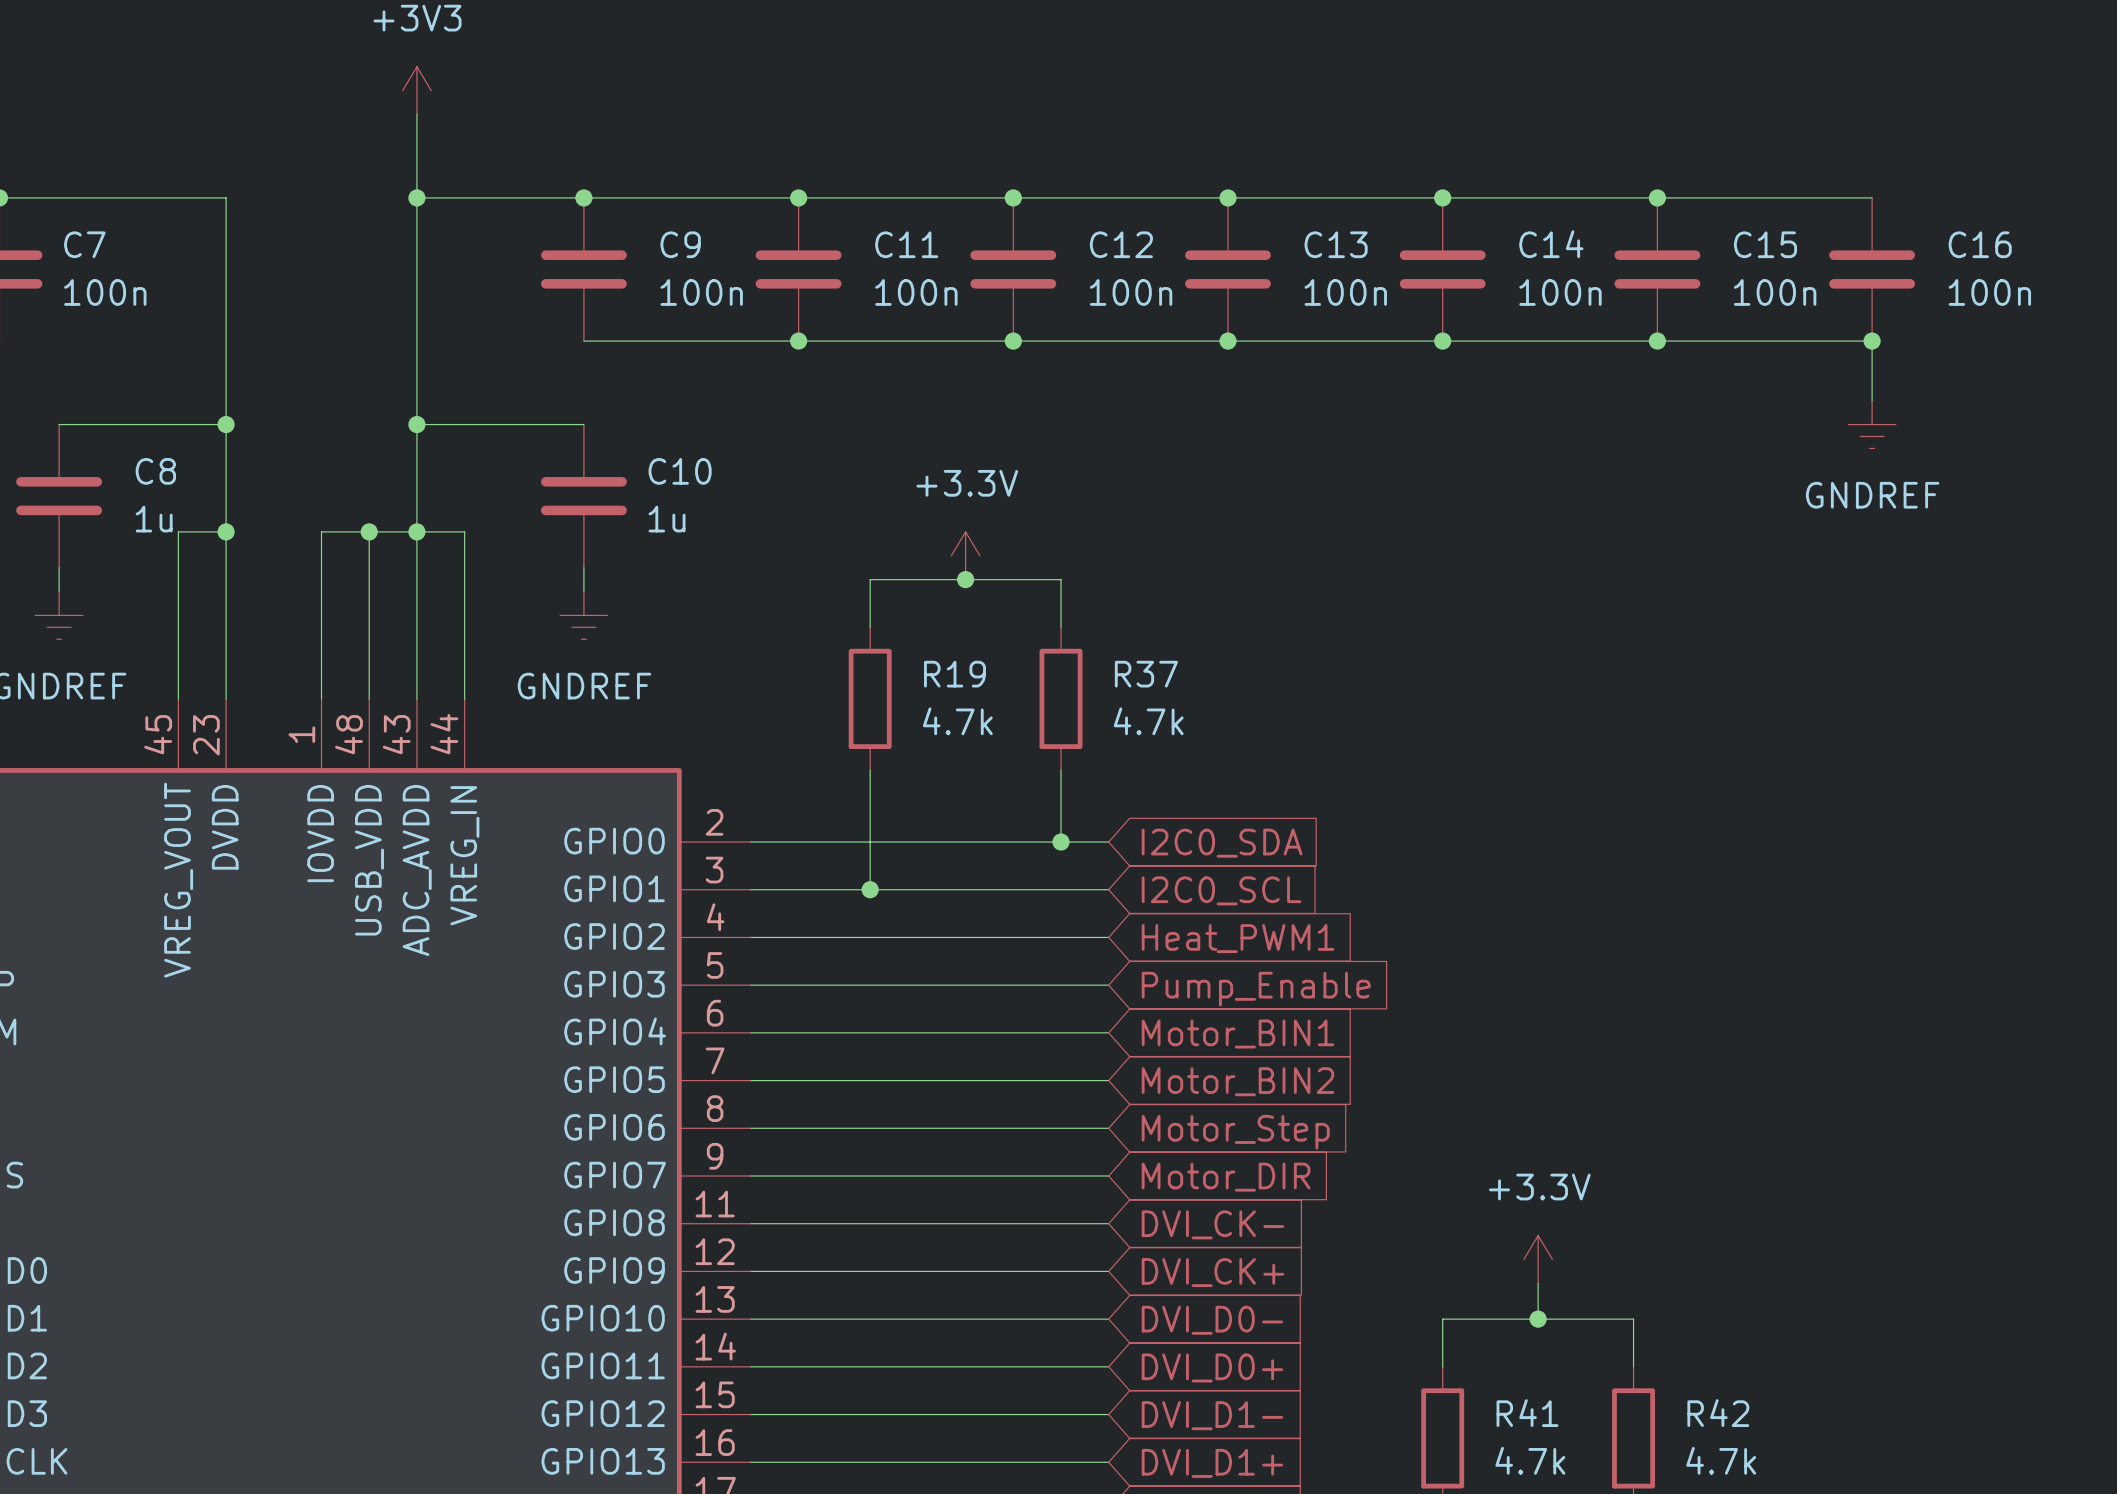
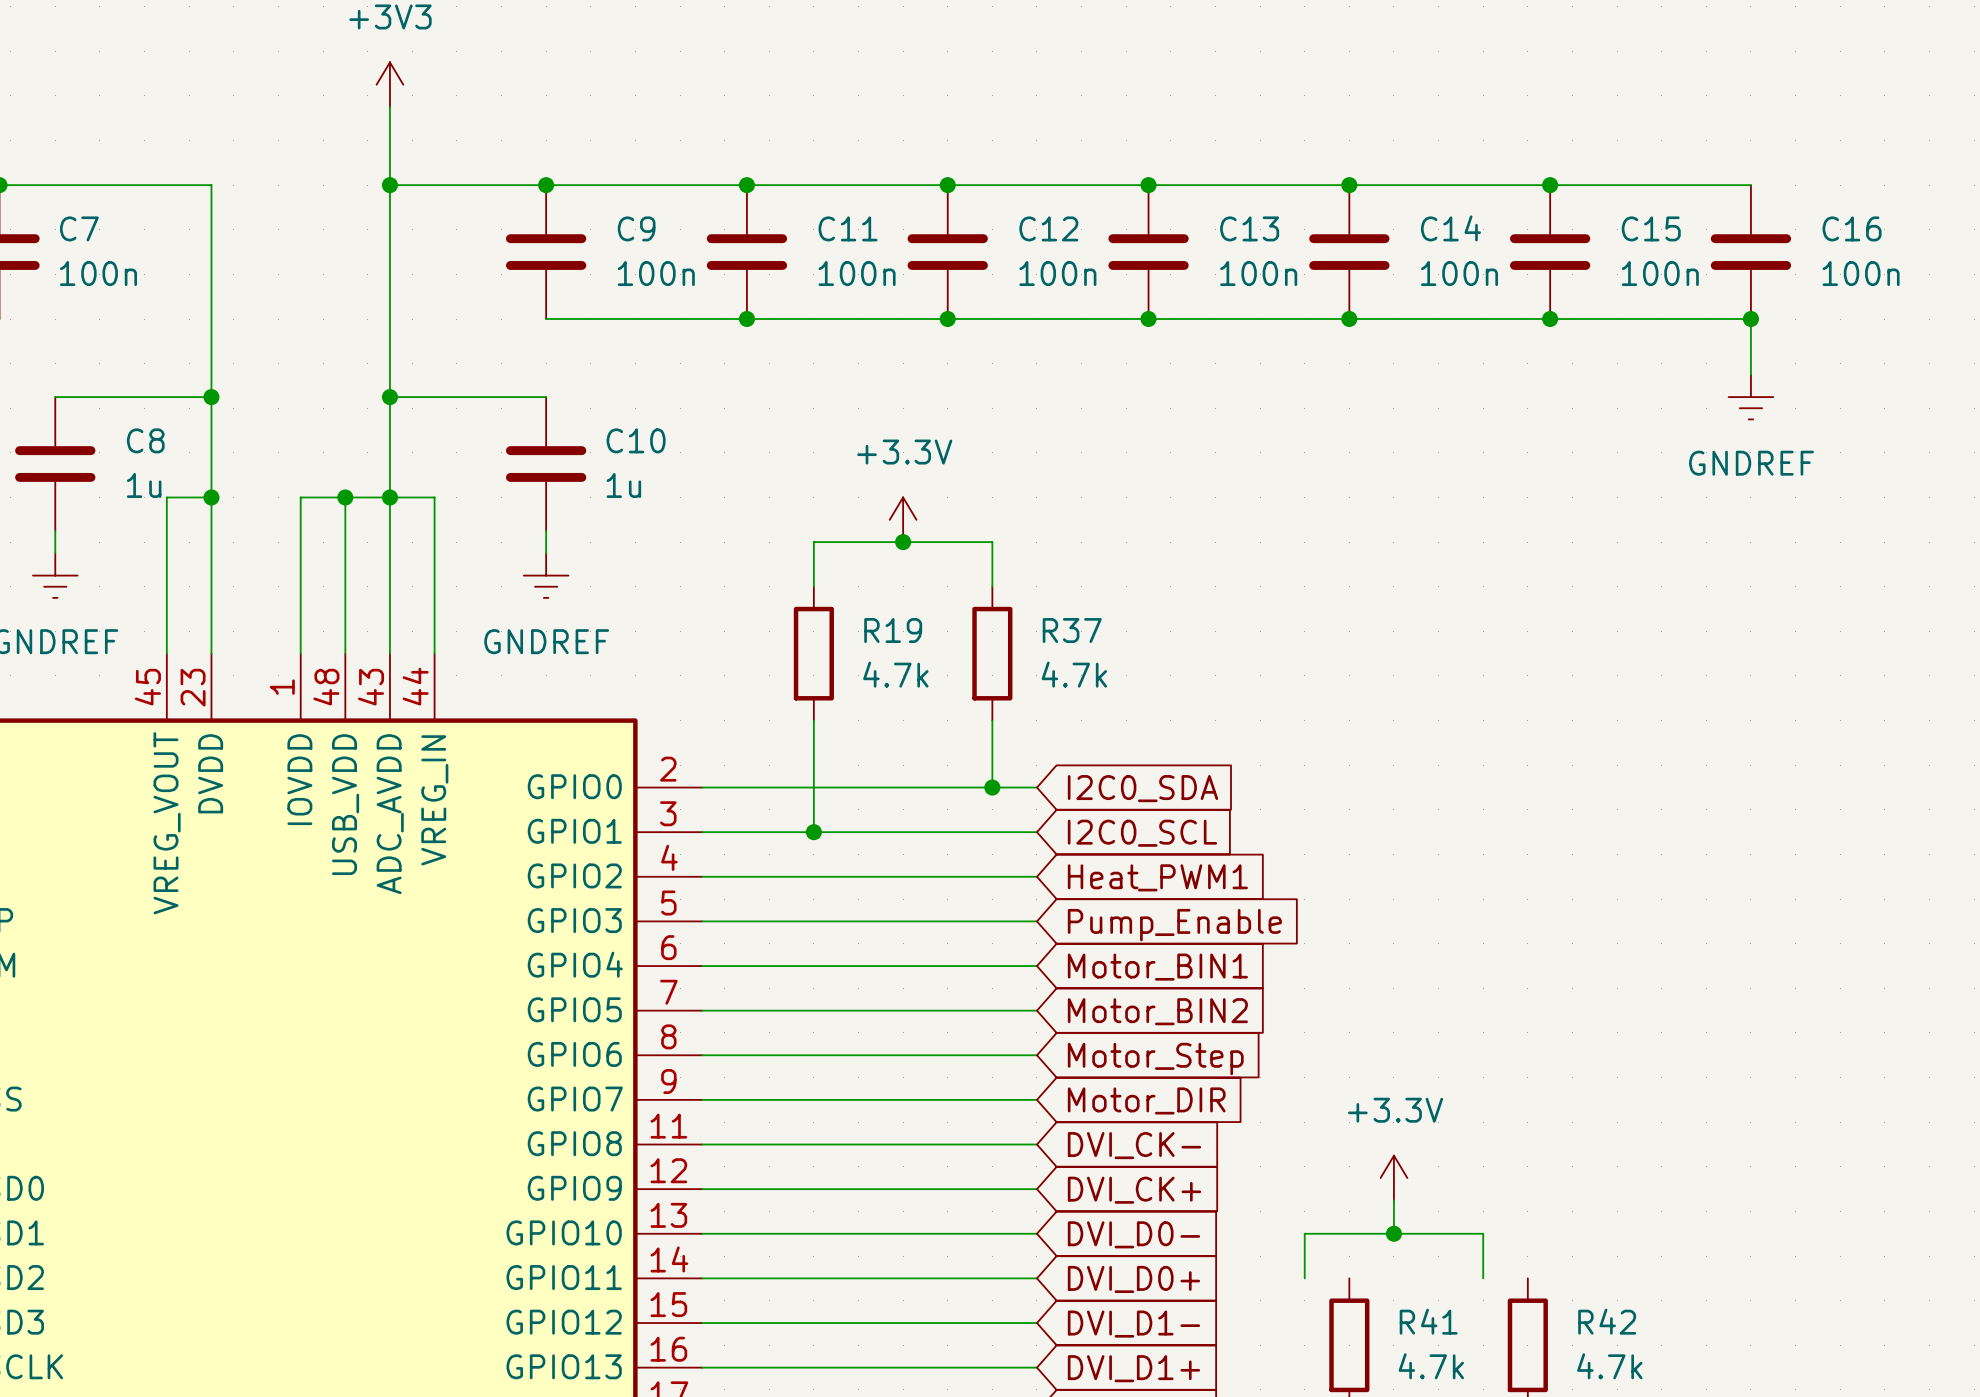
power symbol position: +3.3V (1538, 1259) -> +3.3V (1393, 1177)
wire: (1538, 1283) (1538, 1319) -> (1393, 1200) (1393, 1233)
wire: (1442, 1319) (1442, 1366) -> (1349, 1233) (1304, 1233) (1304, 1278)
junction position: (1538, 1319) -> (1393, 1233)
wire: (1585, 1319) (1633, 1319) (1633, 1366) -> (1483, 1233) (1483, 1278)

